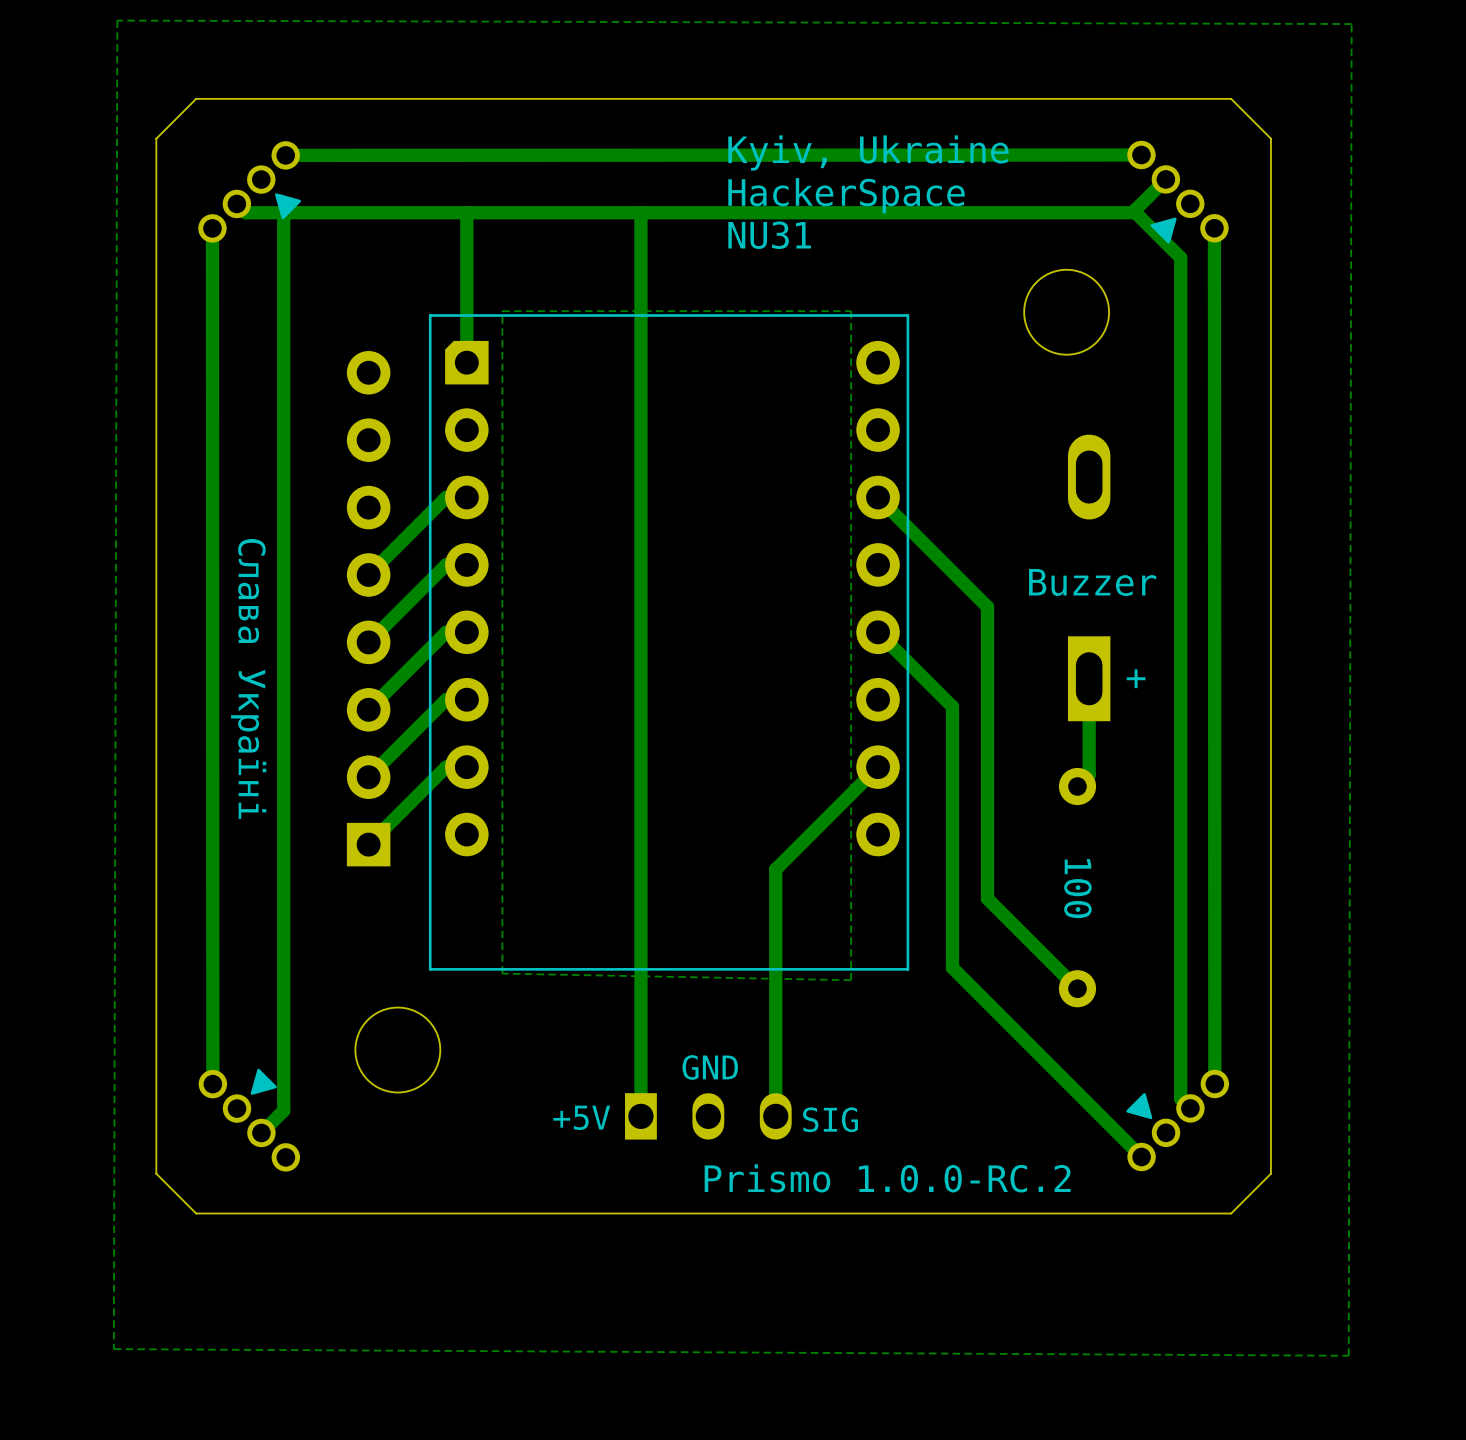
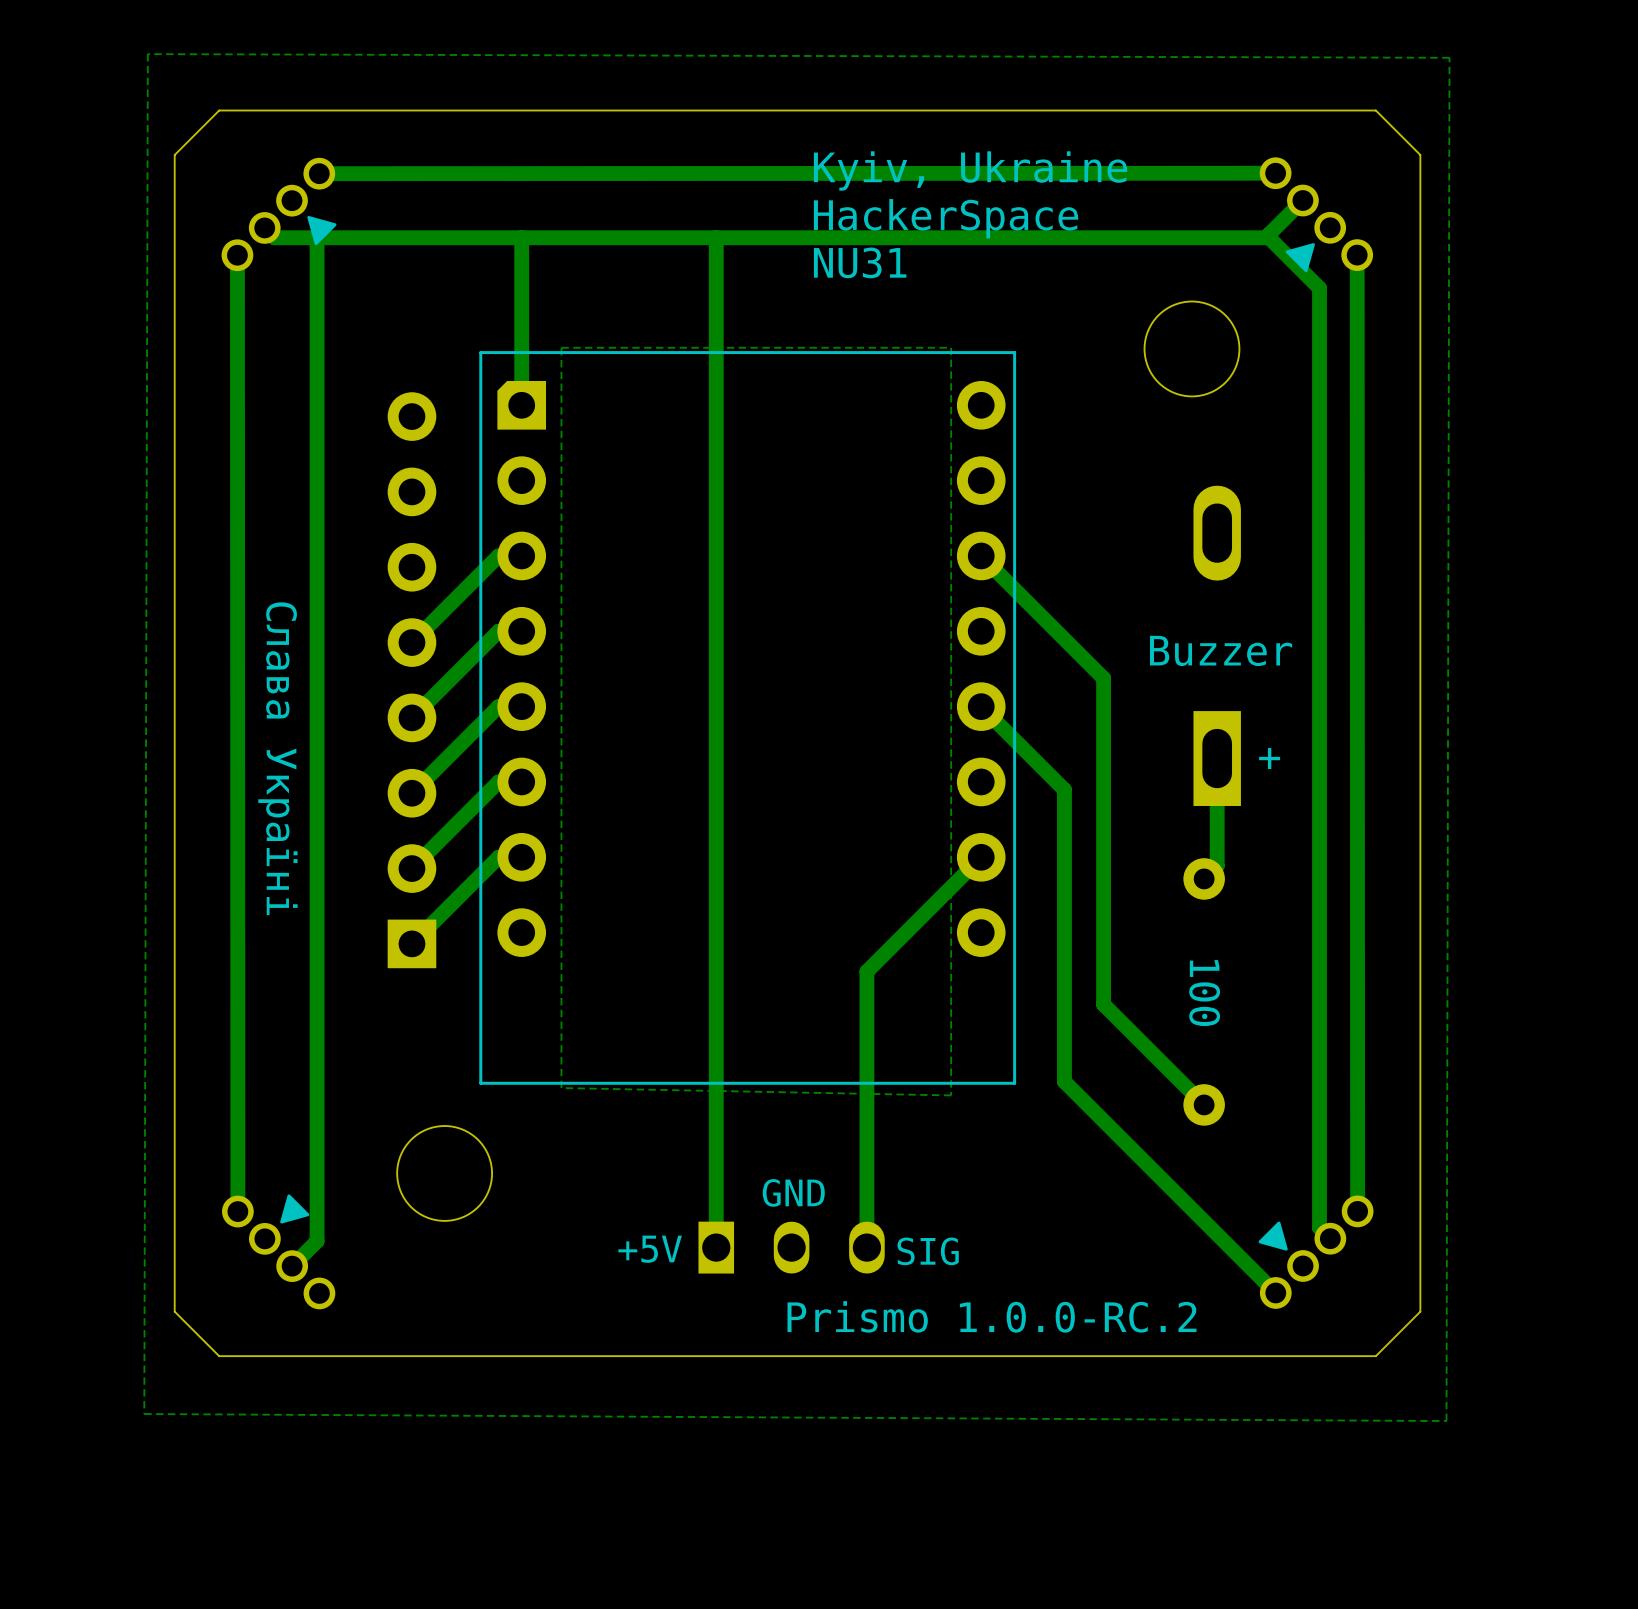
bottom zone outline: (117, 20) (1351, 24) (1348, 1355) (113, 1349) (117, 20) -> (147, 54) (1449, 57) (1446, 1421) (144, 1414) (147, 54)

